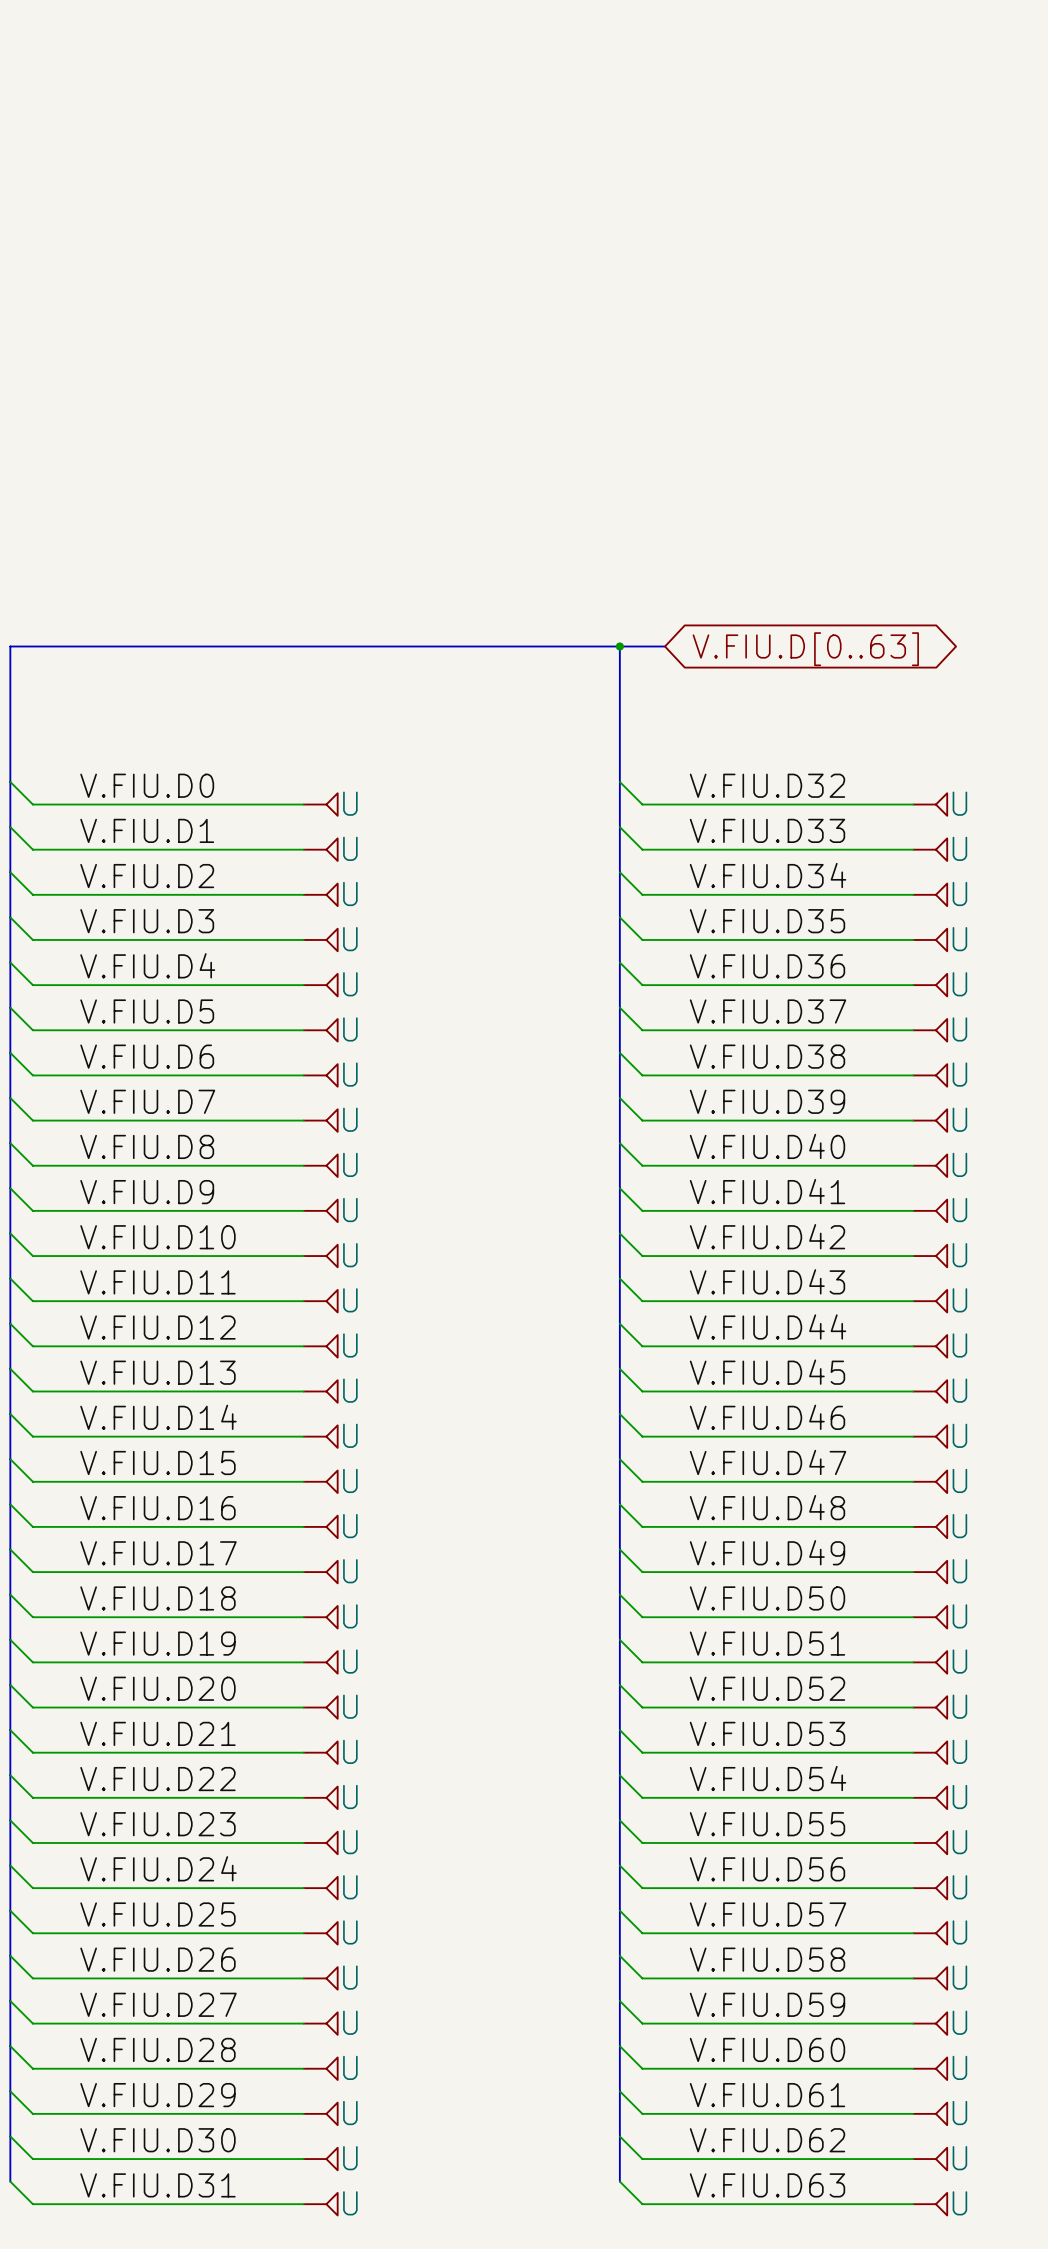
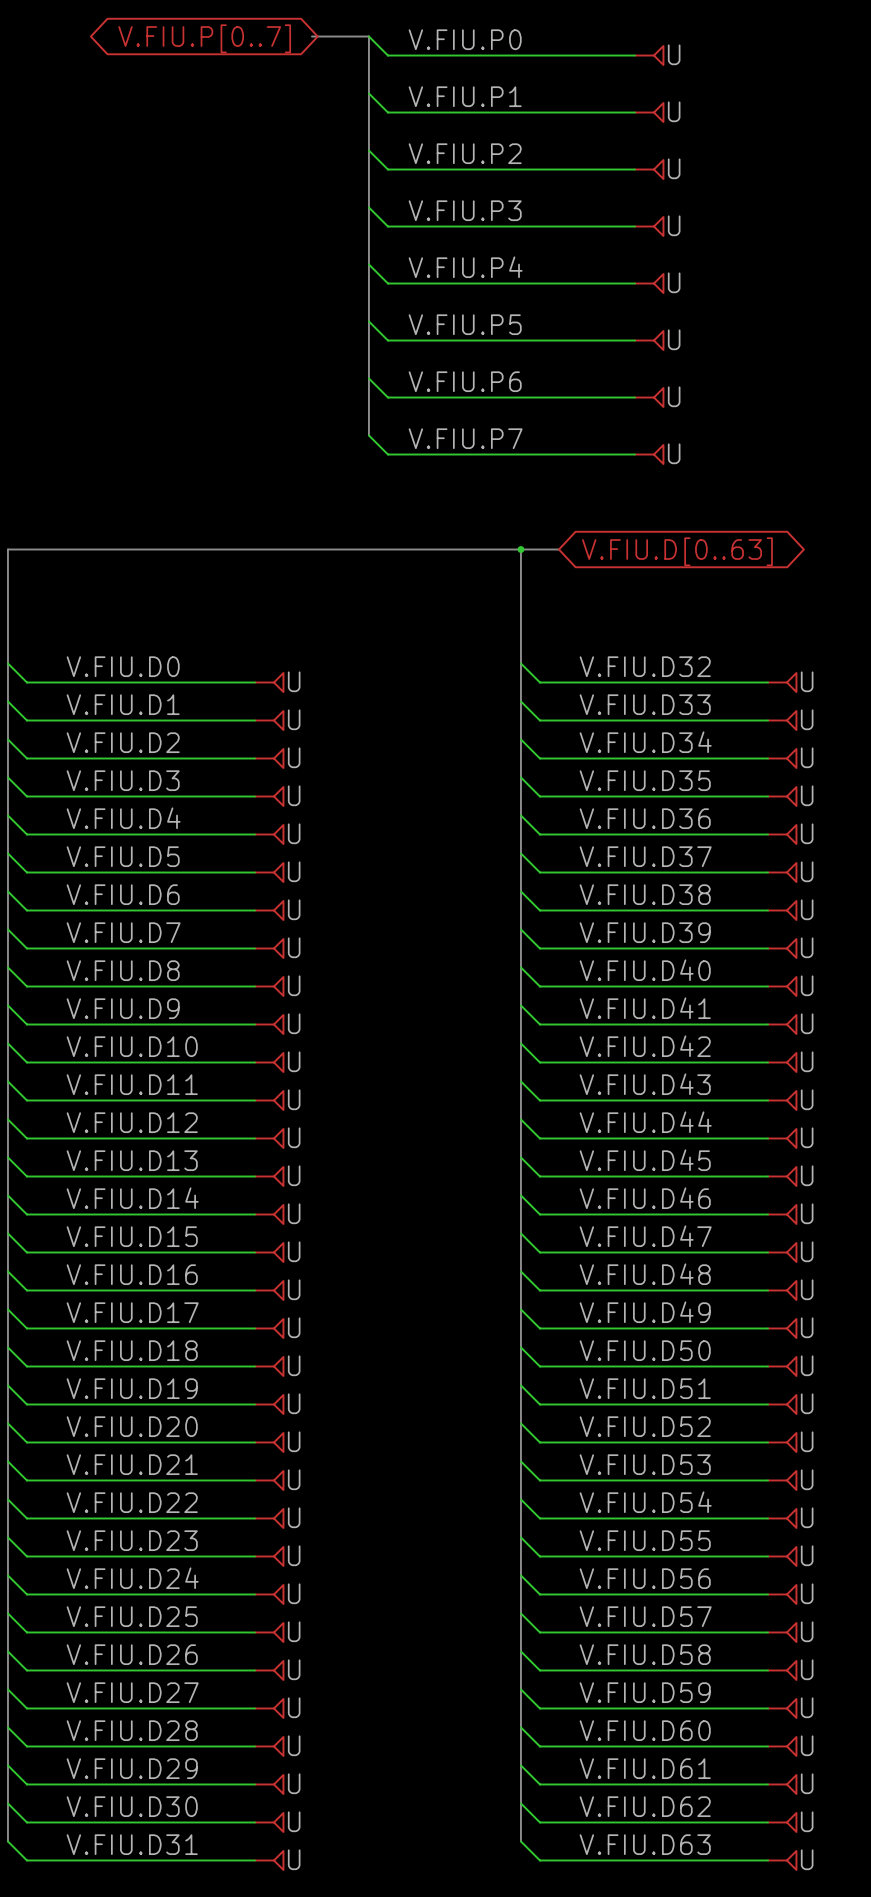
bus: none -> (311, 36) (368, 36) (368, 435)
wire: none -> (368, 36) (387, 55) (634, 55)
global label: none -> V.FIU.P[0..7] (204, 38)
label: none -> V.FIU.P0 (465, 39)
U: none -> (649, 55)
wire: none -> (368, 93) (387, 112) (634, 112)
label: none -> V.FIU.P1 (465, 96)
U: none -> (649, 112)
wire: none -> (368, 150) (387, 169) (634, 169)
label: none -> V.FIU.P2 (465, 153)
U: none -> (649, 169)
wire: none -> (368, 207) (387, 226) (634, 226)
label: none -> V.FIU.P3 (465, 210)
U: none -> (649, 226)
wire: none -> (368, 264) (387, 283) (634, 283)
label: none -> V.FIU.P4 (465, 267)
U: none -> (649, 283)
wire: none -> (368, 321) (387, 340) (634, 340)
label: none -> V.FIU.P5 (465, 324)
U: none -> (649, 340)
wire: none -> (368, 378) (387, 397) (634, 397)
label: none -> V.FIU.P6 (465, 381)
U: none -> (649, 397)
wire: none -> (368, 435) (387, 454) (634, 454)
label: none -> V.FIU.P7 (465, 438)
U: none -> (649, 454)

